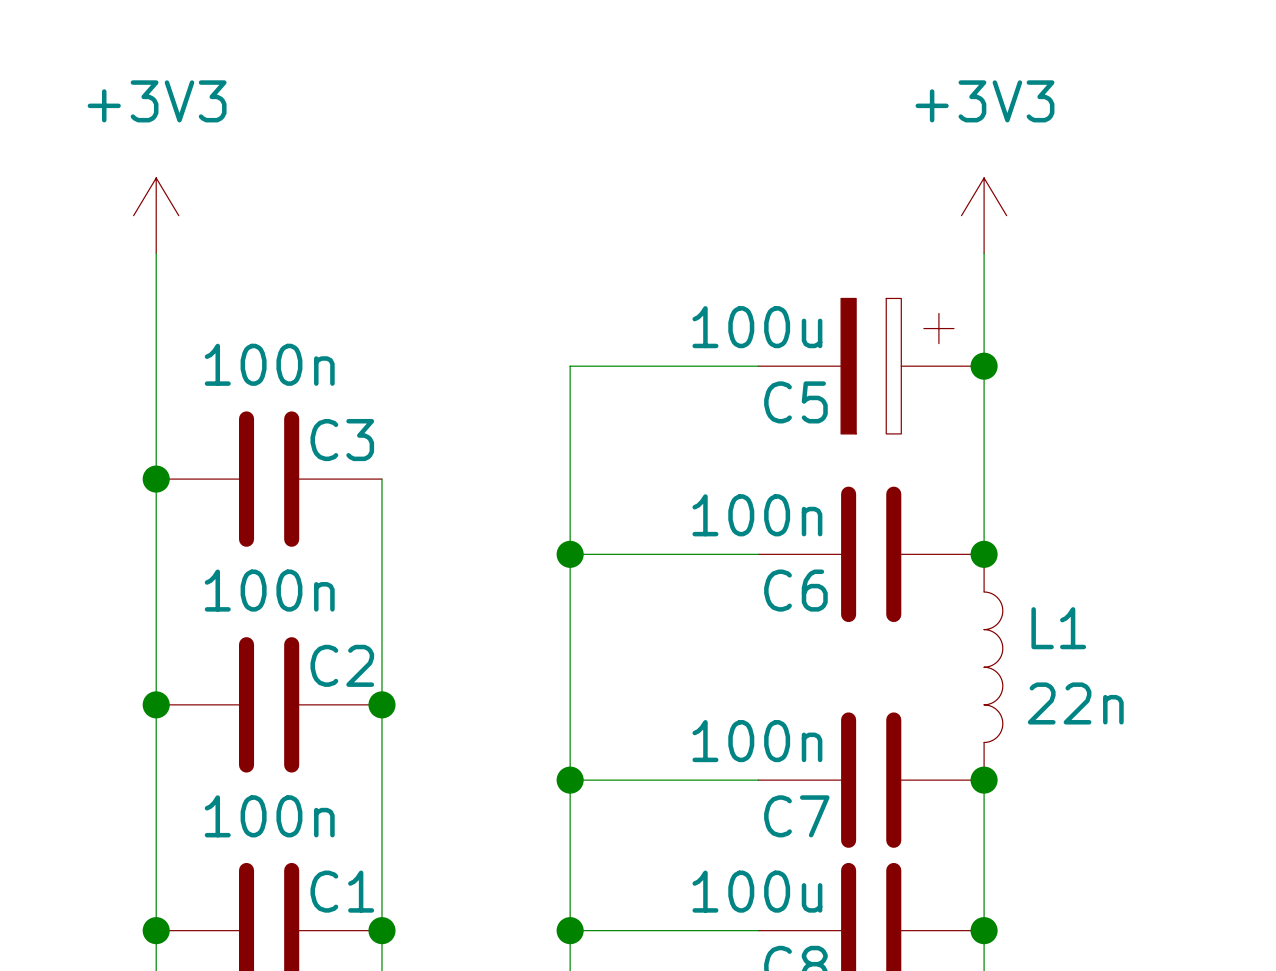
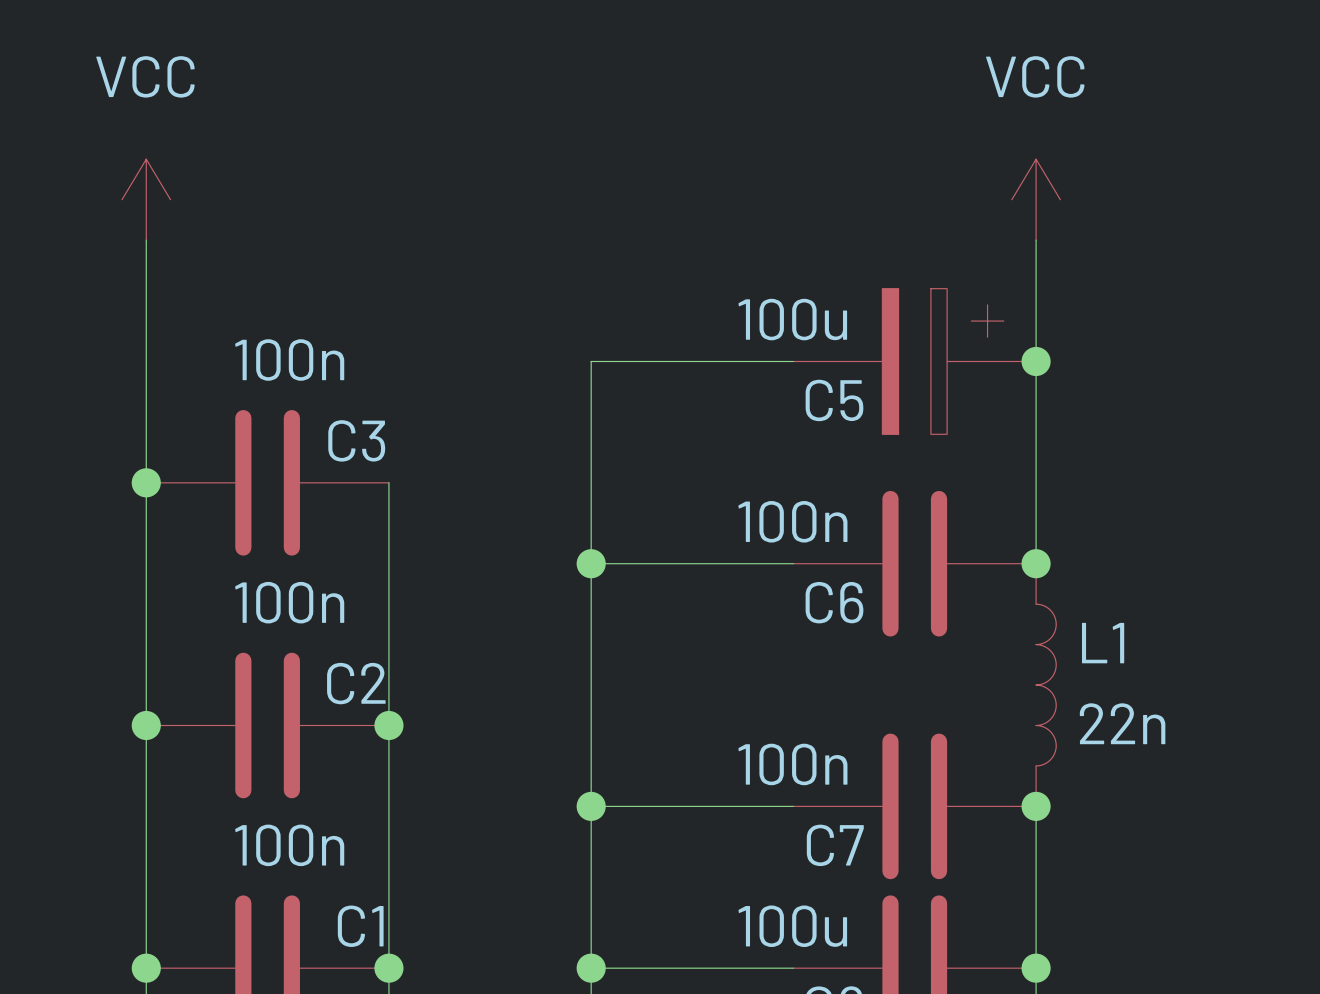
power symbol: +3V3 (156, 215) -> VCC (146, 199)
power symbol: +3V3 (984, 215) -> VCC (1036, 199)

